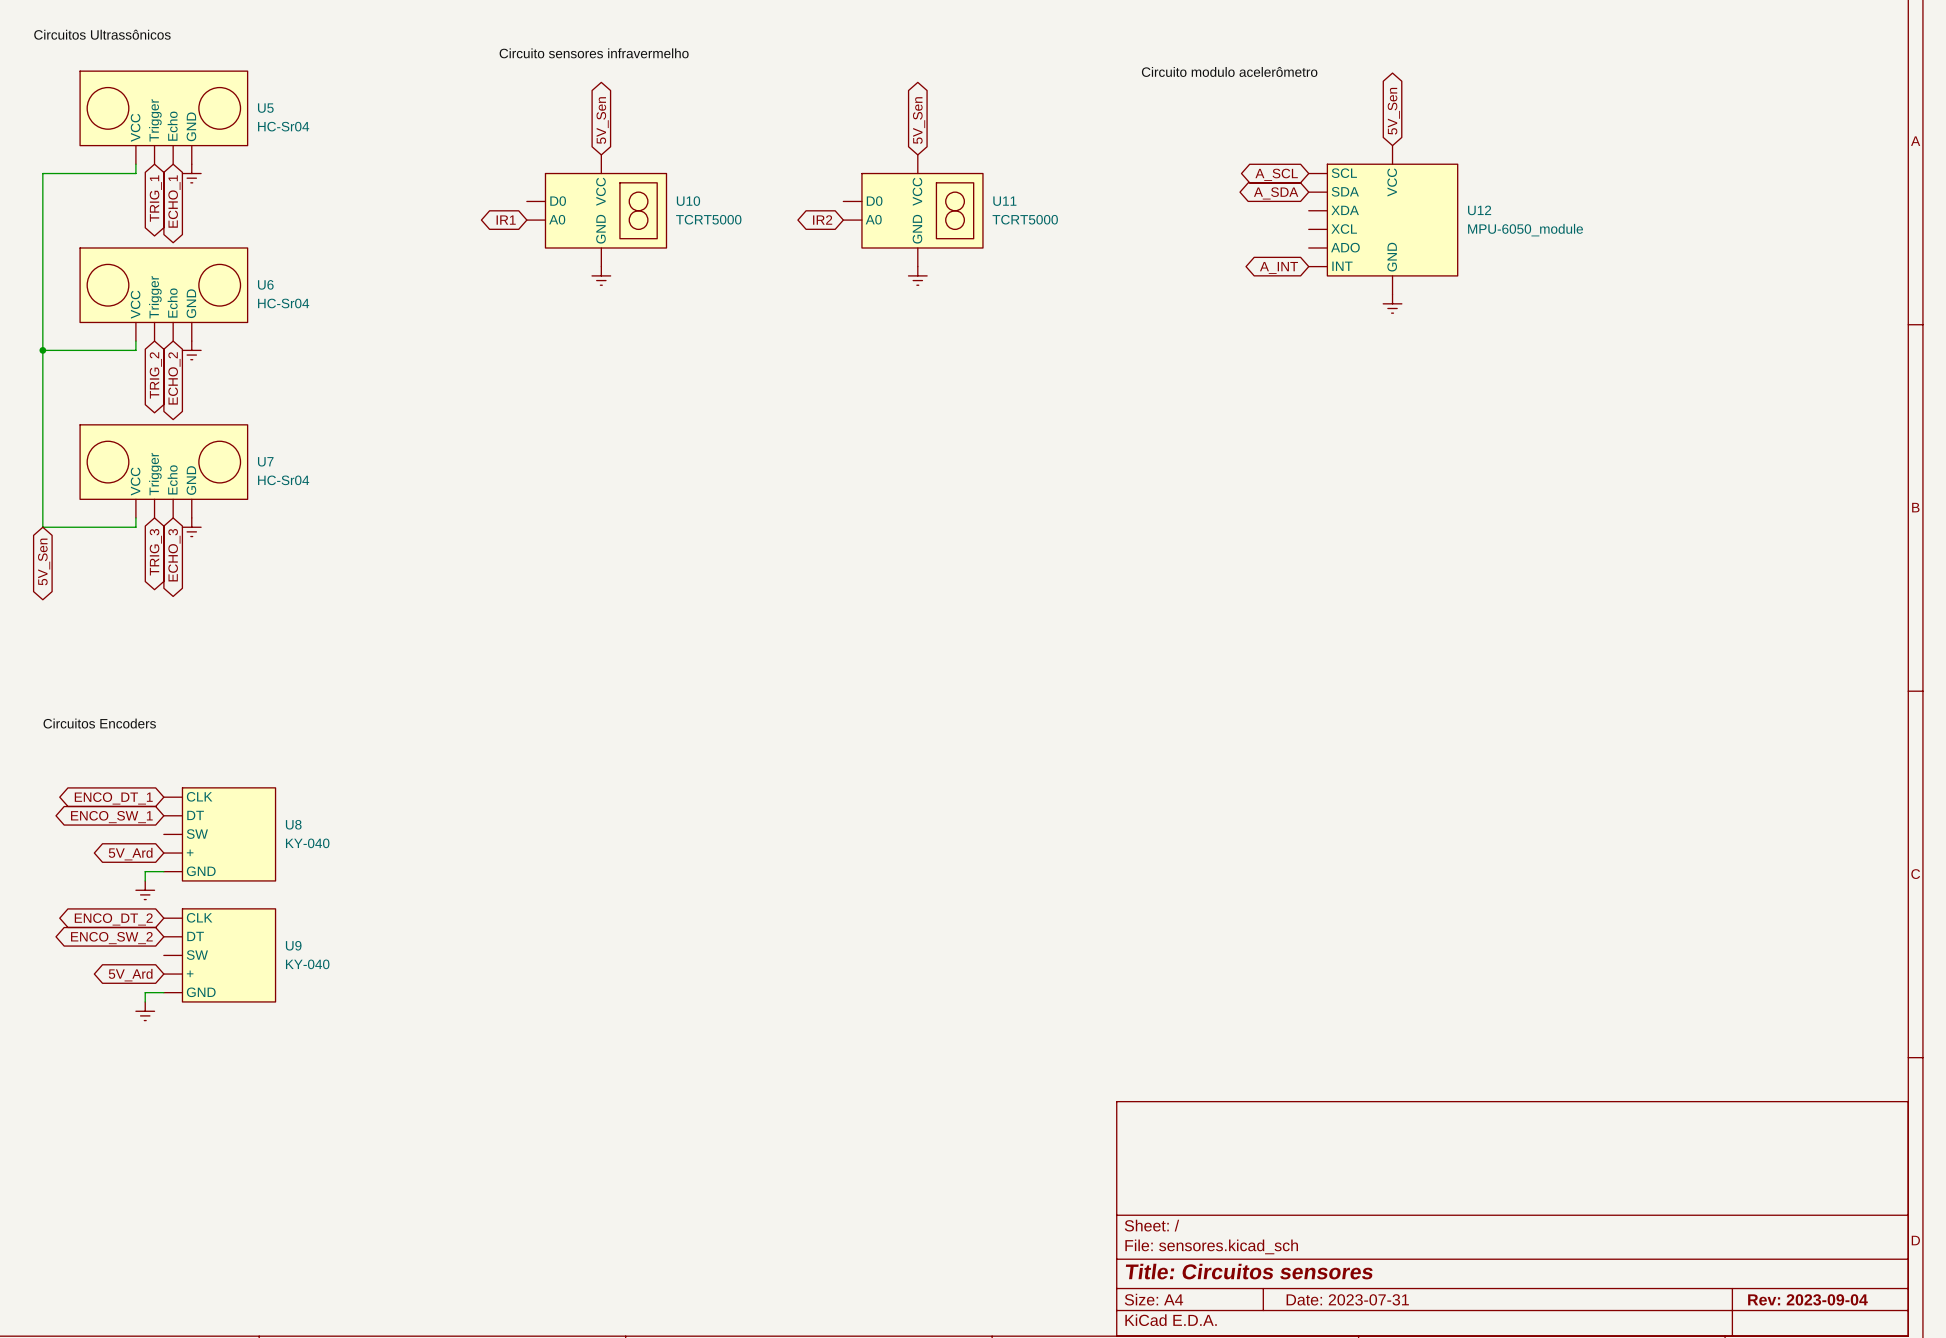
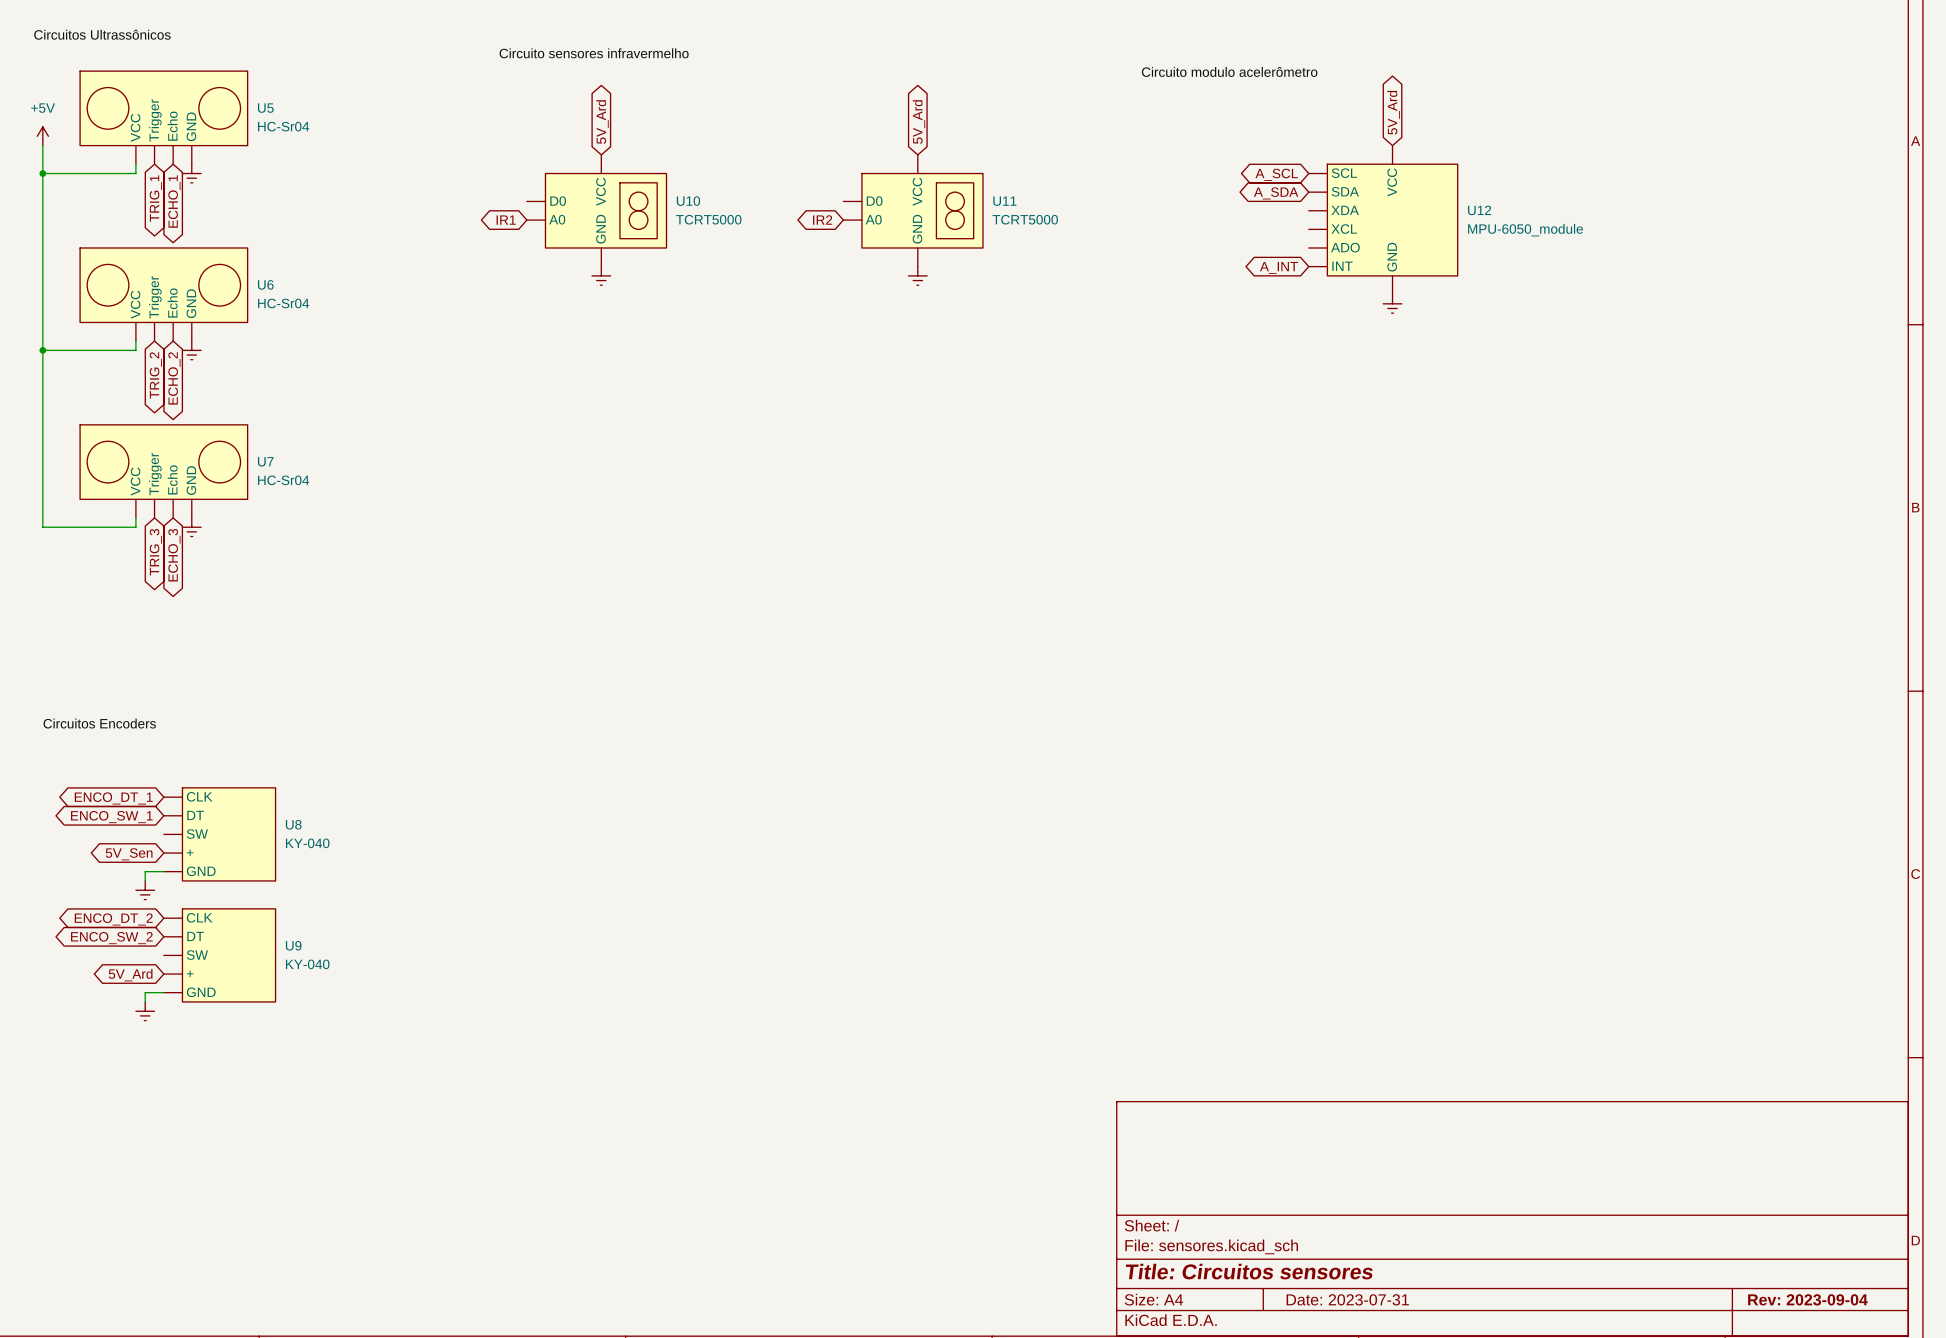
global label: 5V_Sen (1393, 111) -> 5V_Ard (1393, 112)
global label: 5V_Sen (602, 120) -> 5V_Ard (602, 122)
global label: 5V_Sen (919, 120) -> 5V_Ard (918, 122)
power symbol: none -> +5V (42, 136)
wire: none -> (42, 145) (42, 173)
junction: none -> (42, 173)
global label: 5V_Sen (44, 561) -> none
global label: 5V_Ard (130, 854) -> 5V_Sen (129, 854)

